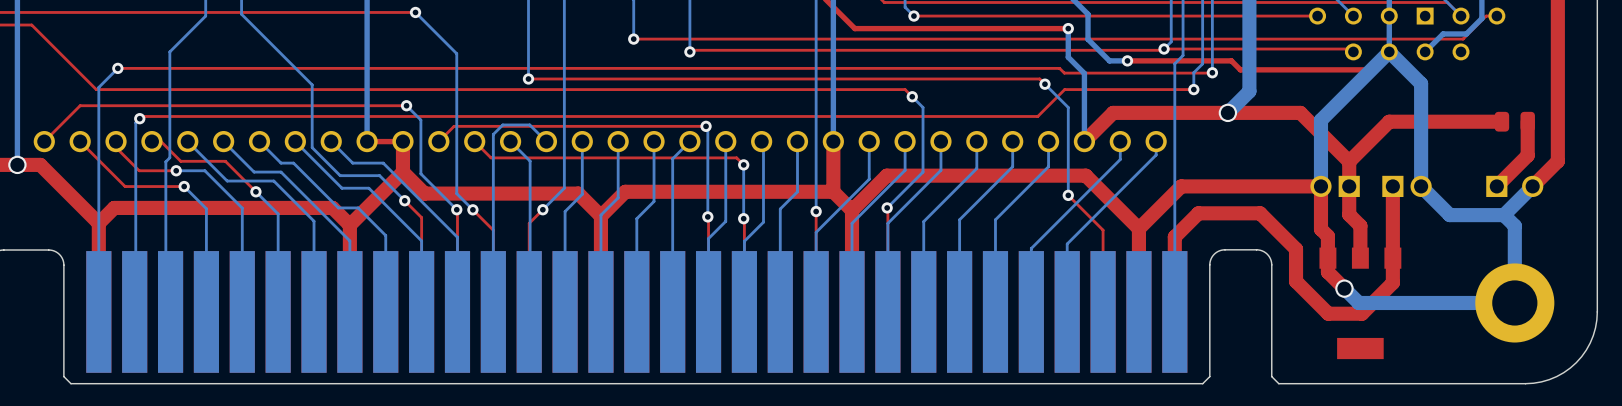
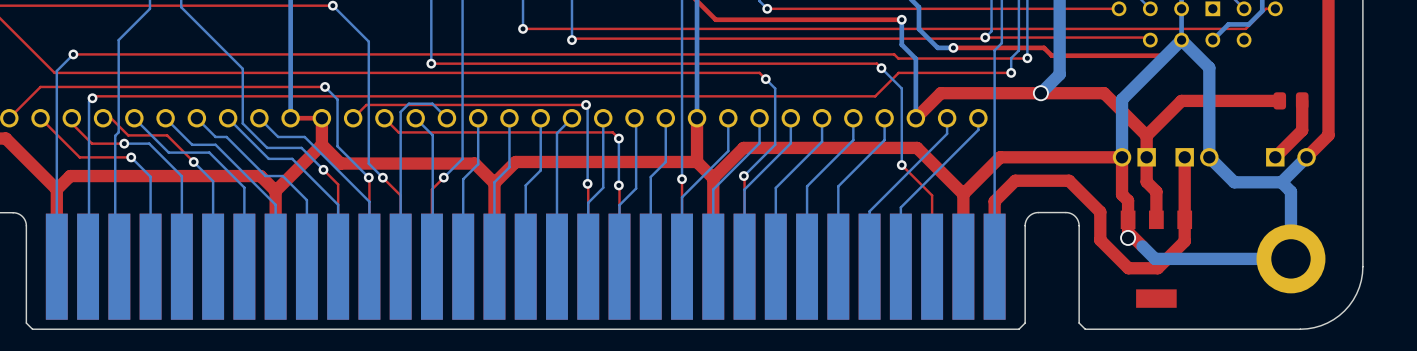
via position: (1344, 288) -> (1128, 237)

